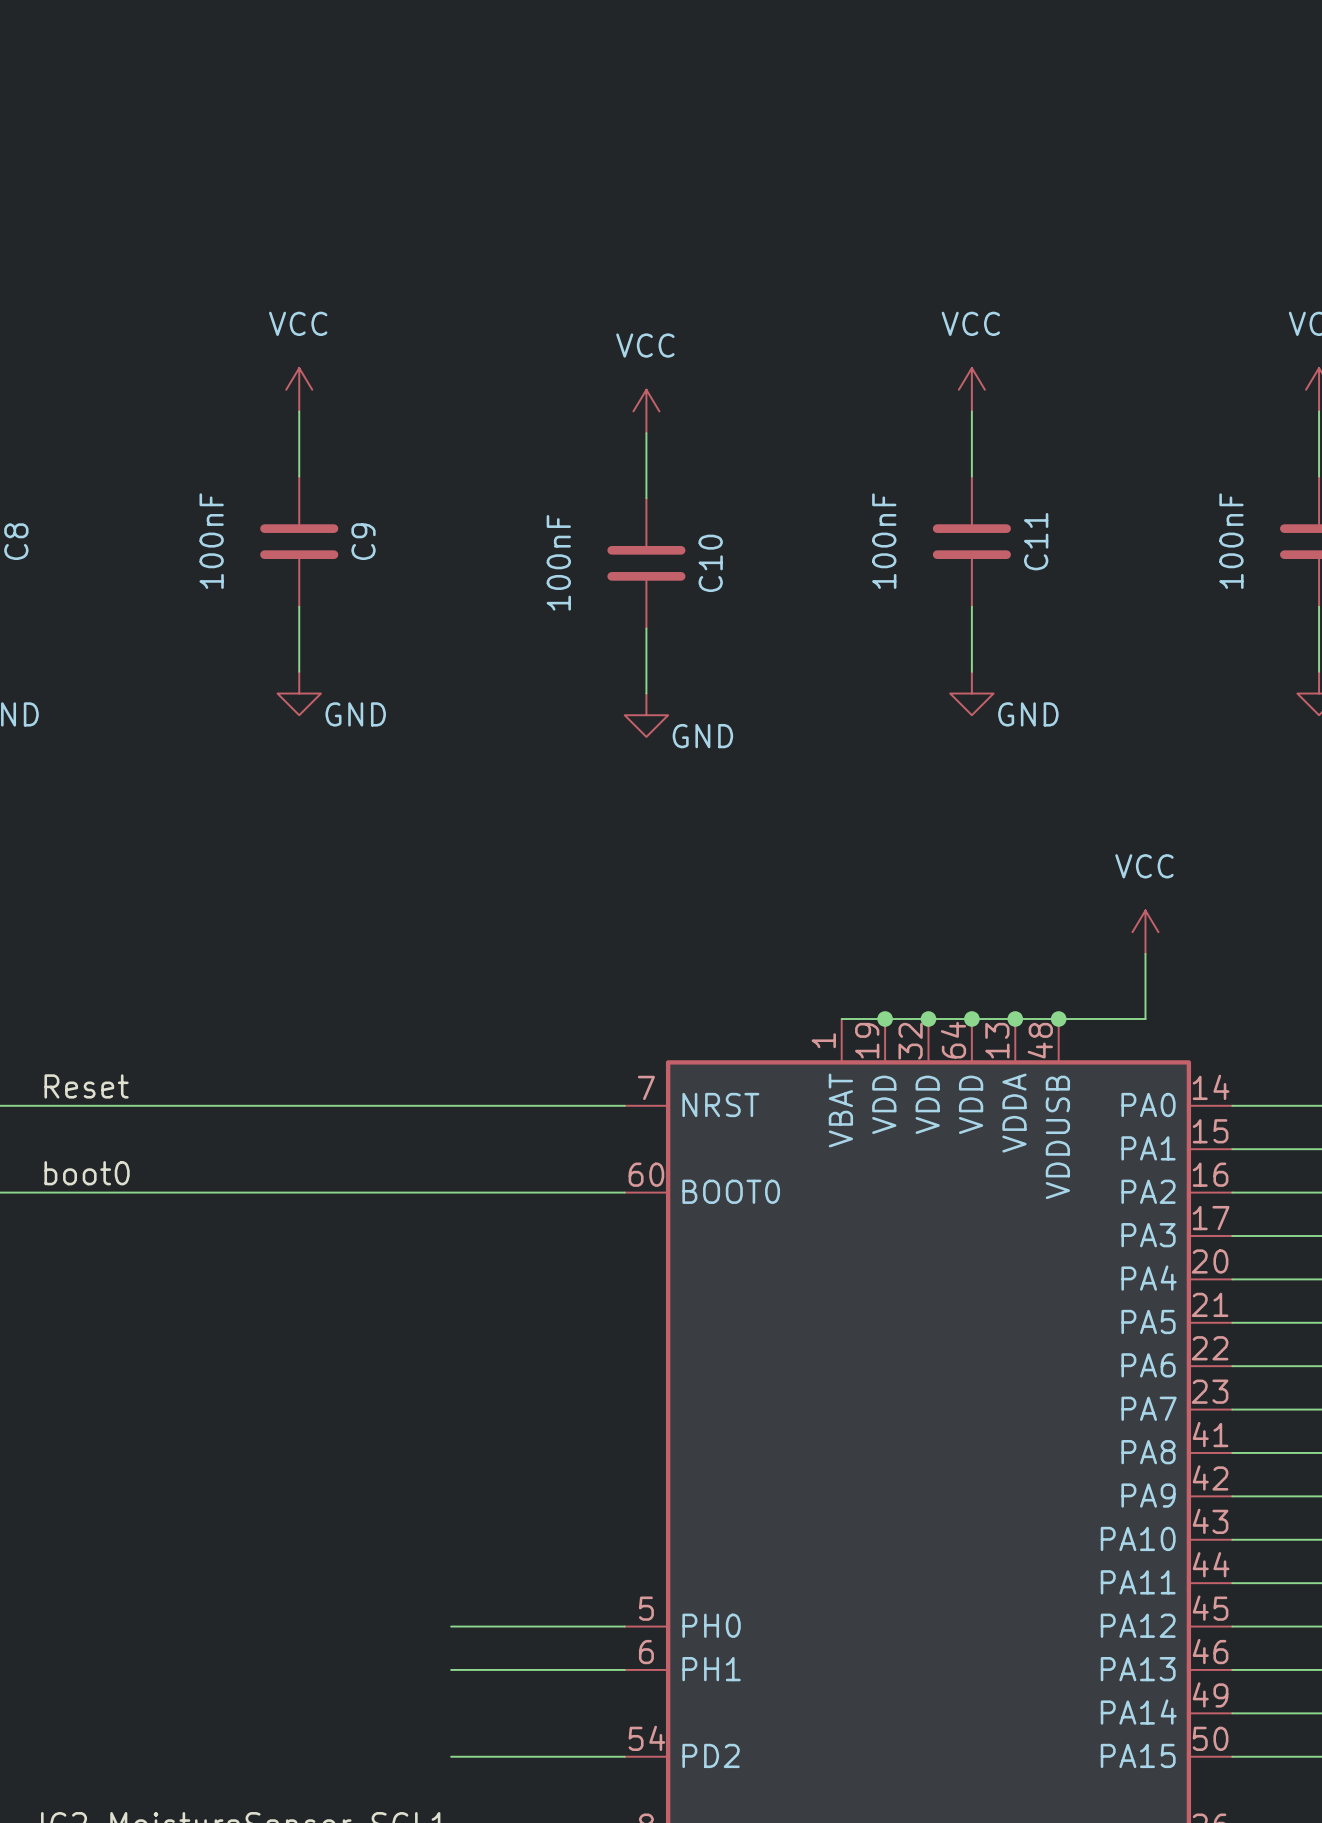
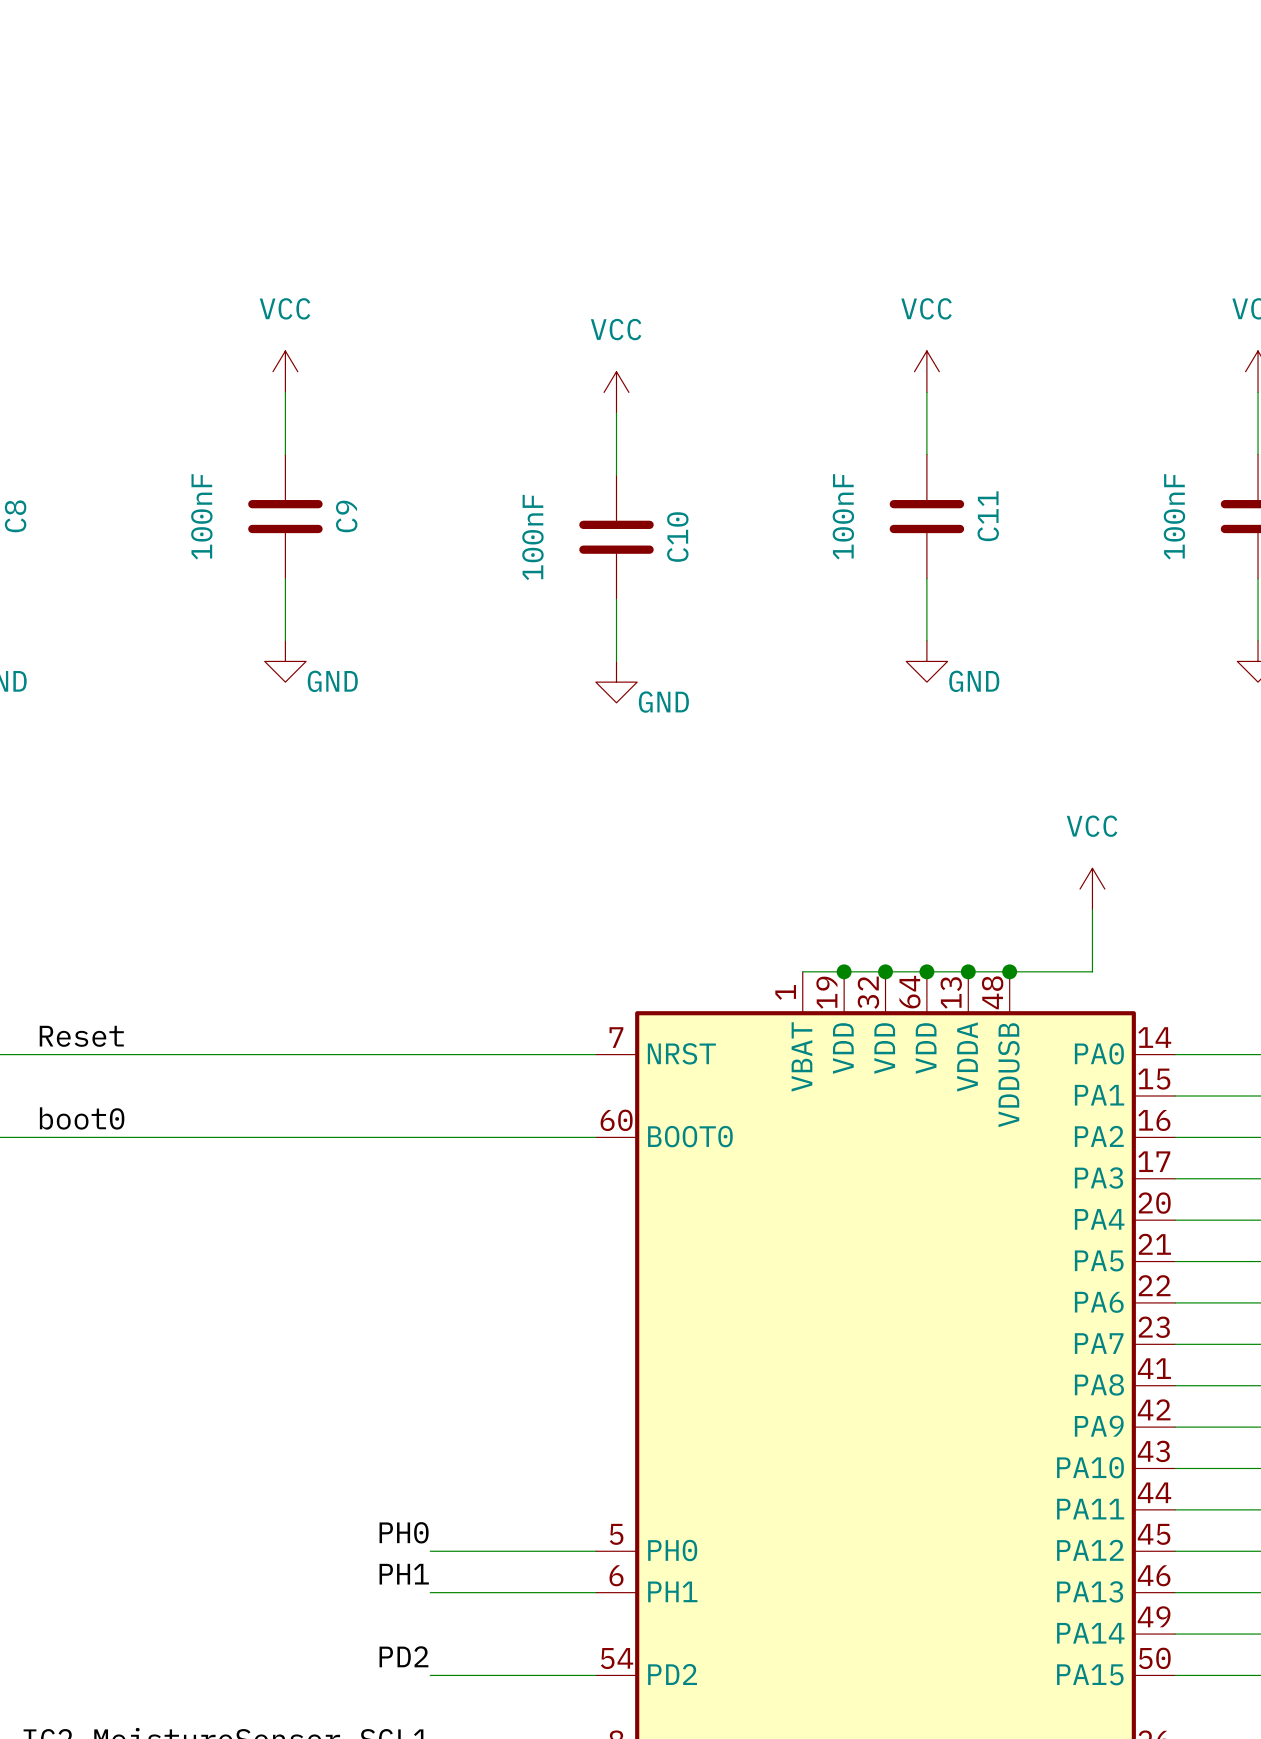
label: none -> PH0 (404, 1532)
label: none -> PH1 (404, 1574)
label: none -> PD2 (403, 1656)

